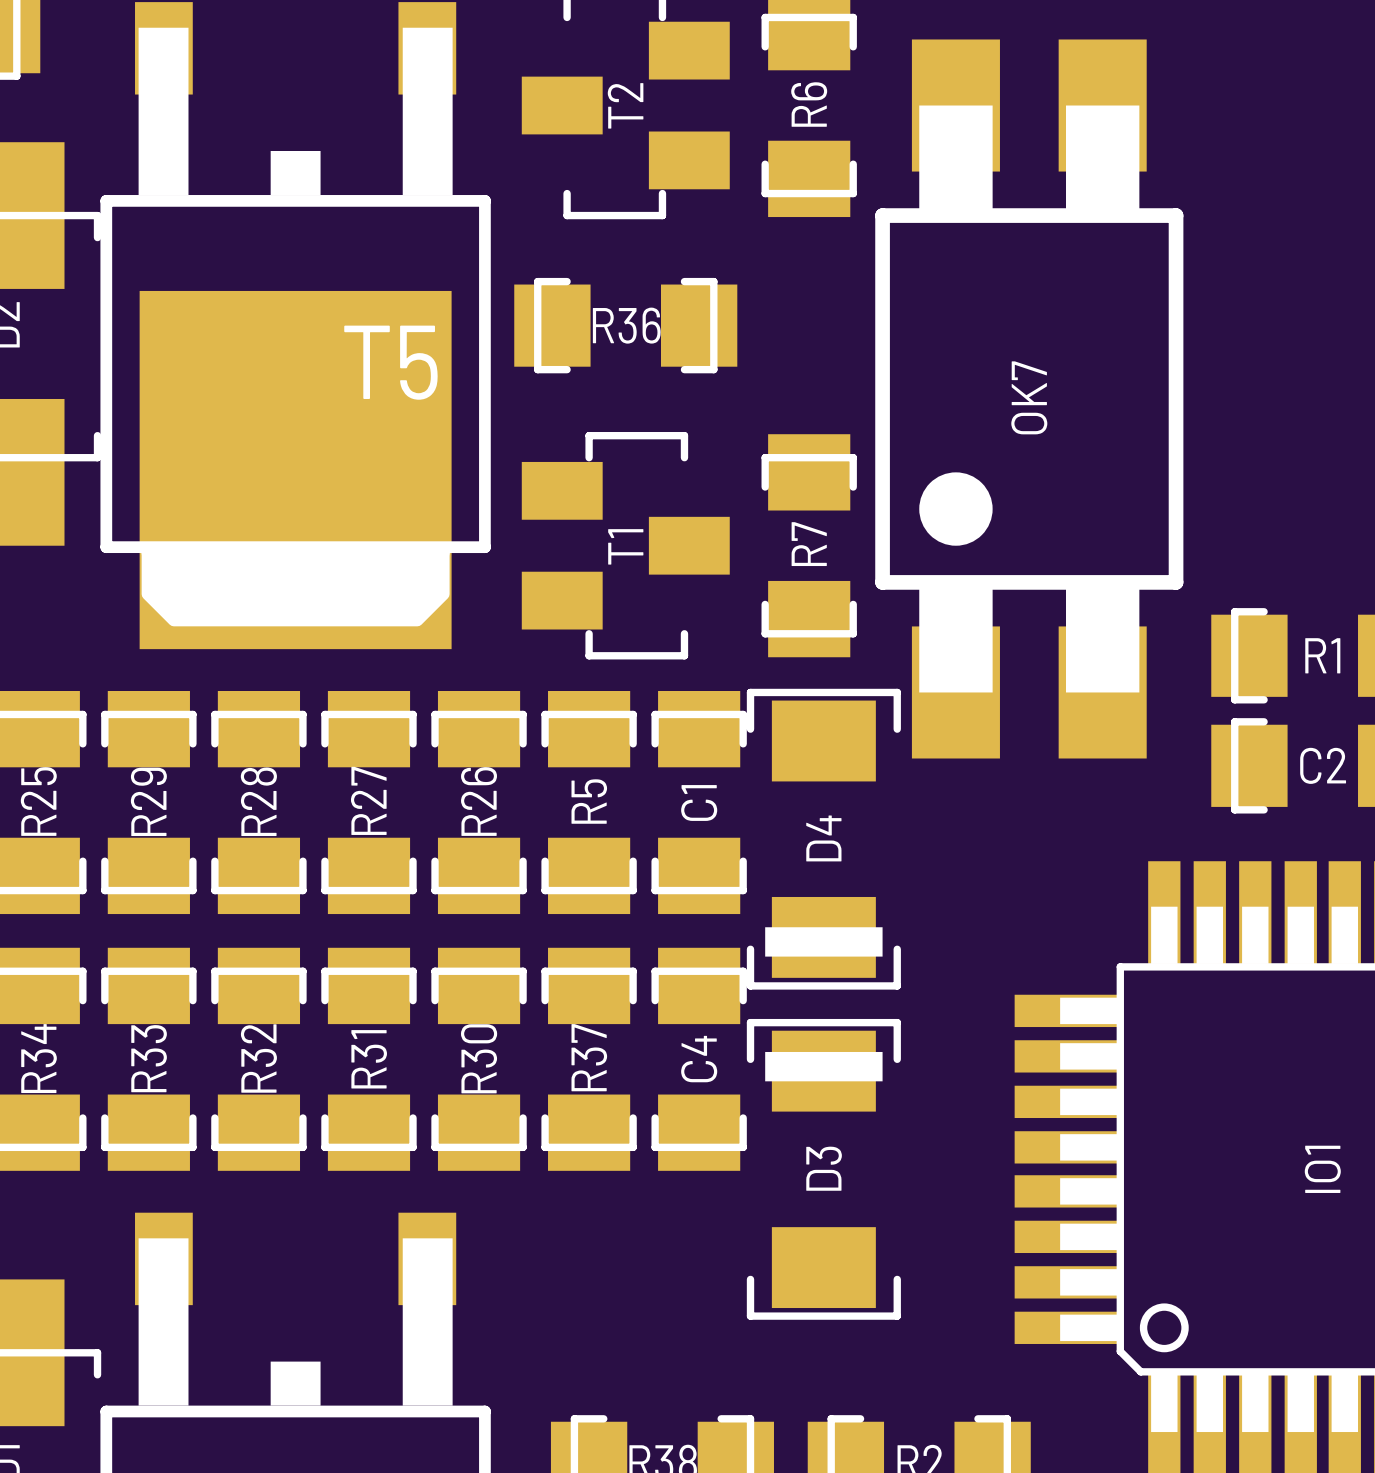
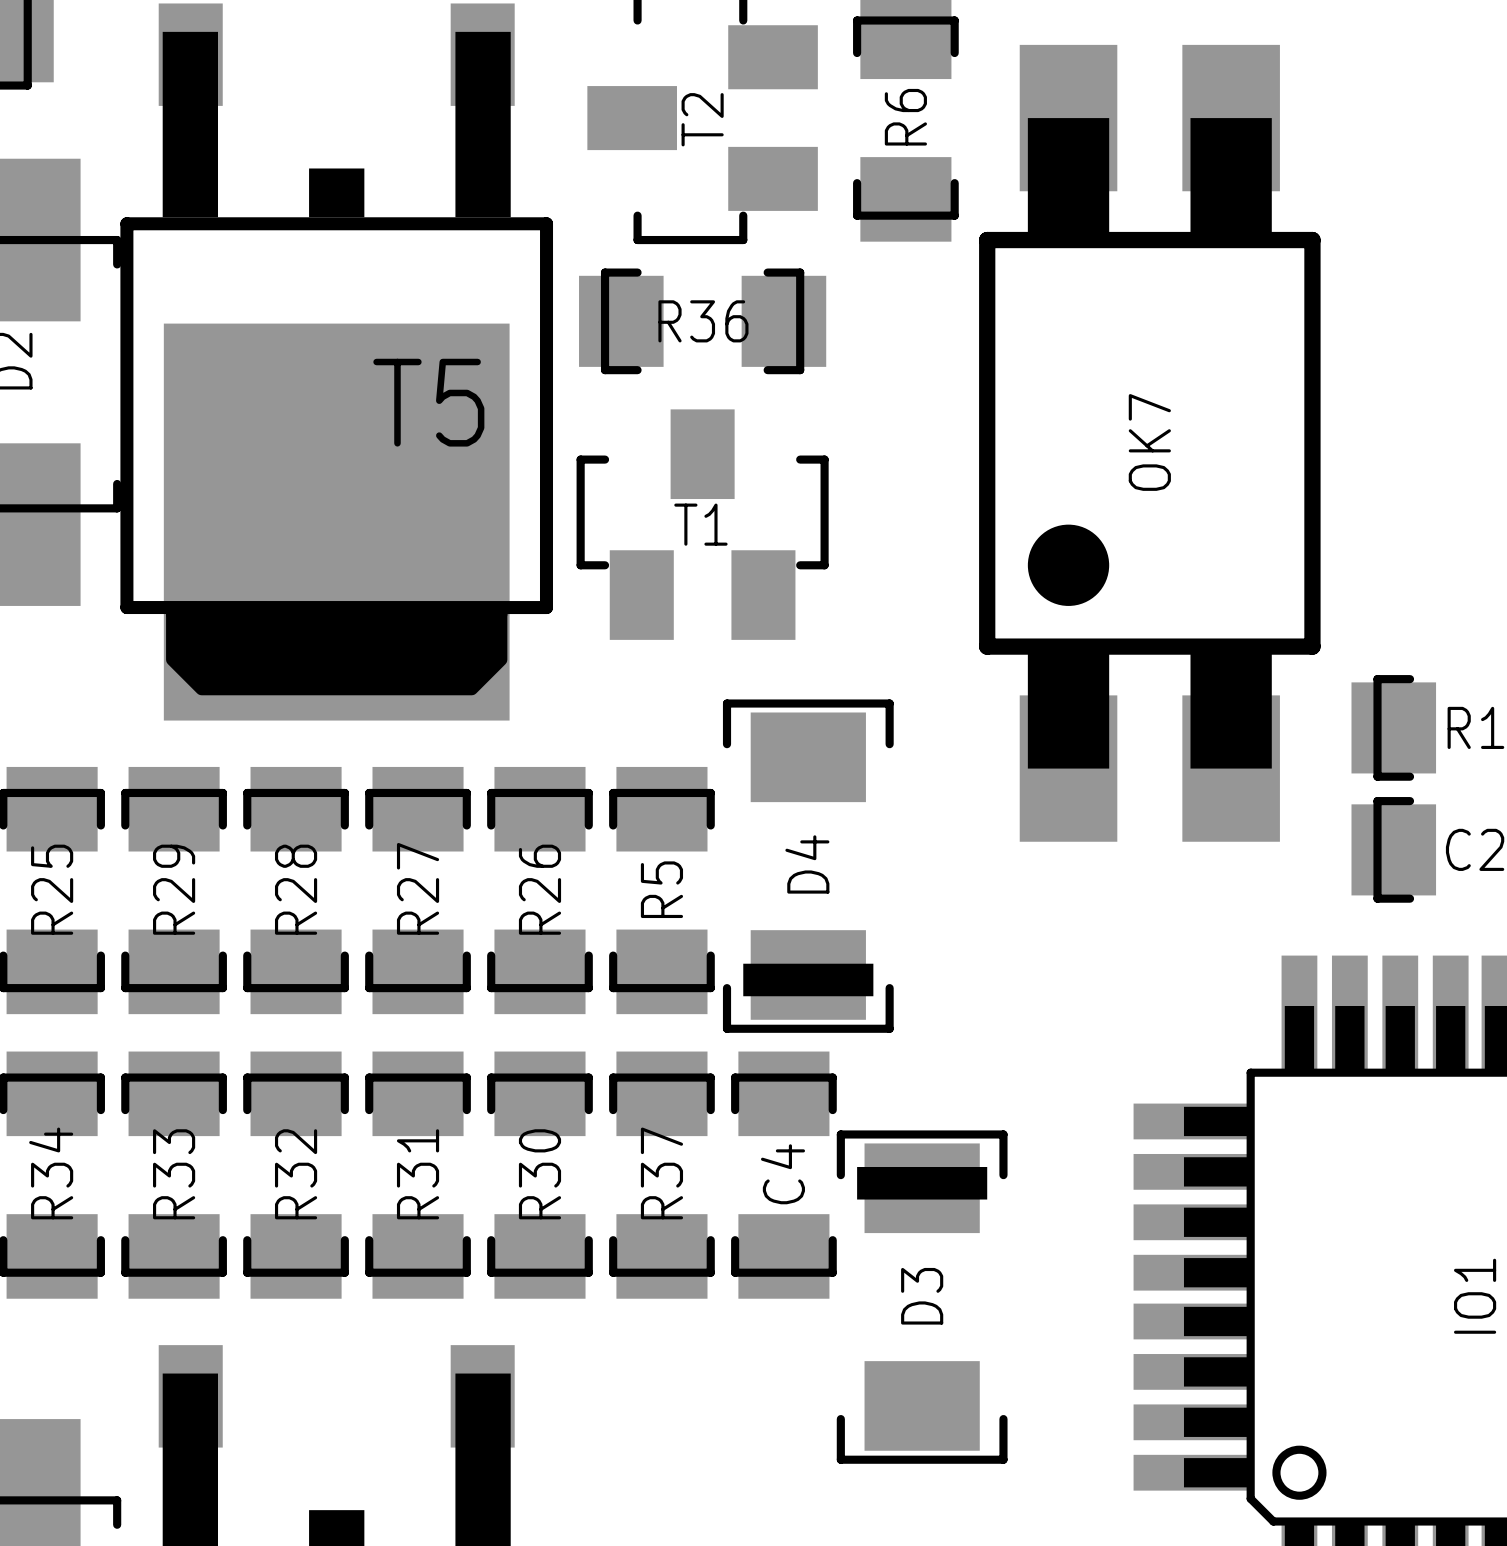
R36 position: (625, 325) -> (702, 321)
T1 rotation: 0° (625, 545) -> 90° counterclockwise (702, 524)
R7: (809, 545) -> none
C1: (699, 802) -> none
D4 position: (823, 839) -> (808, 866)

